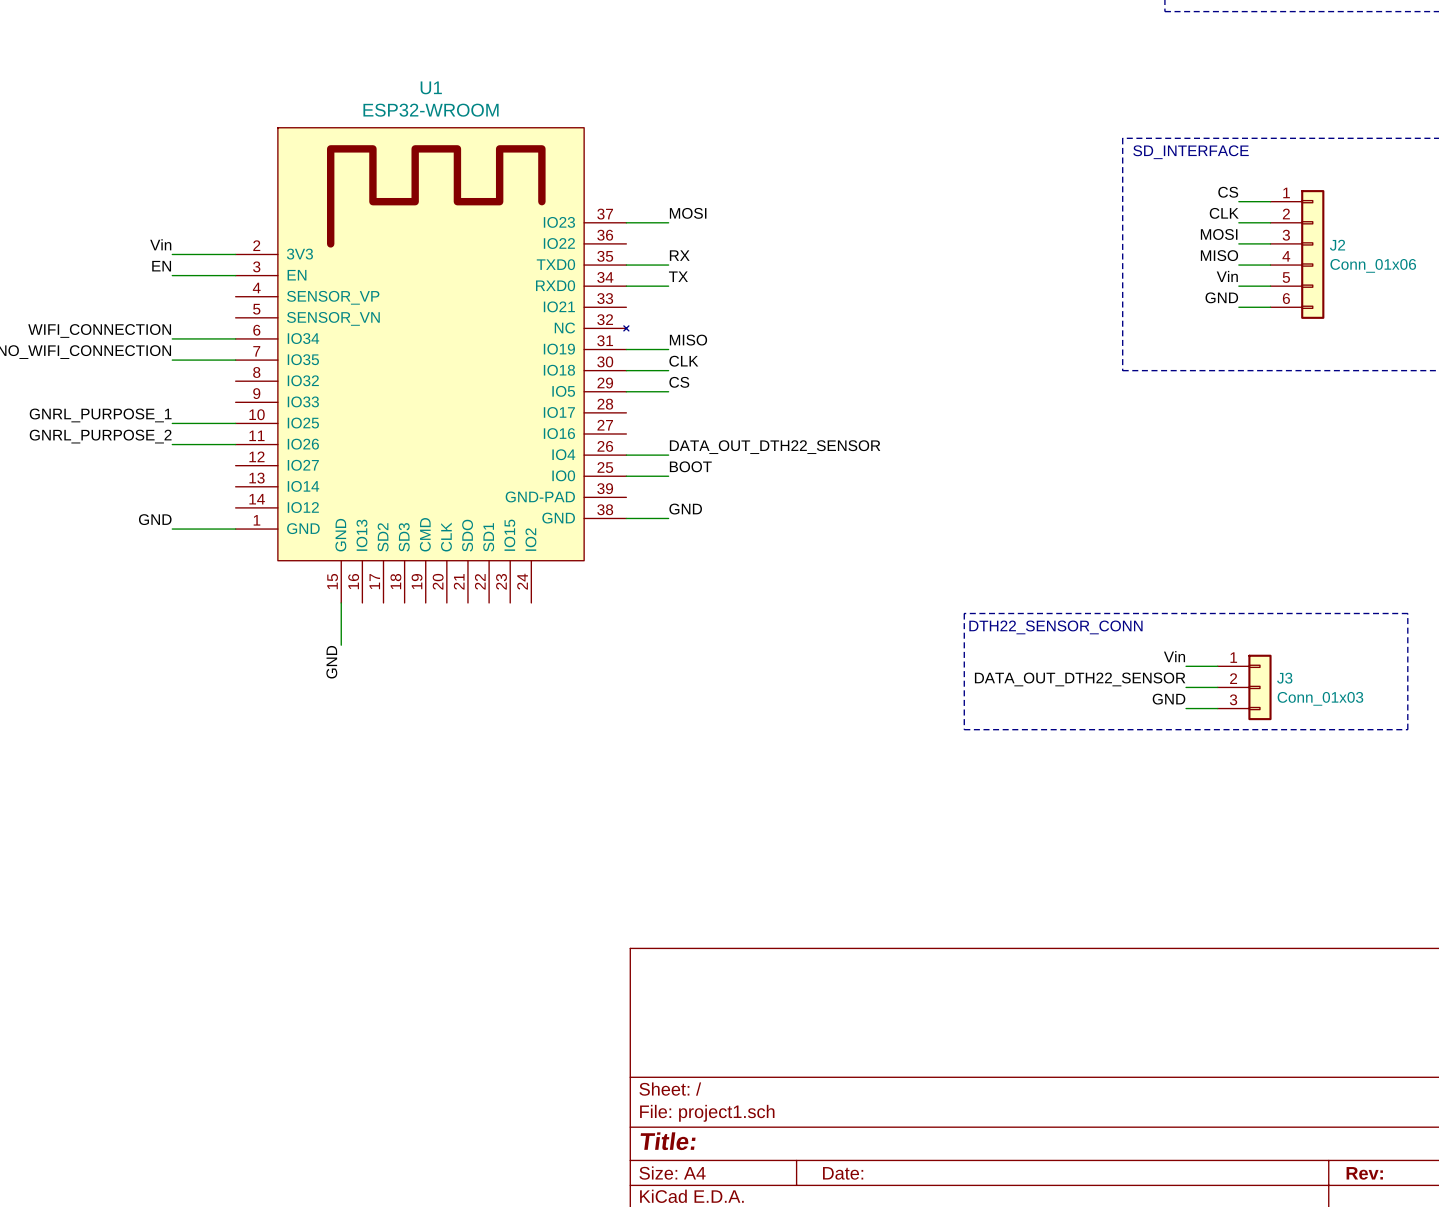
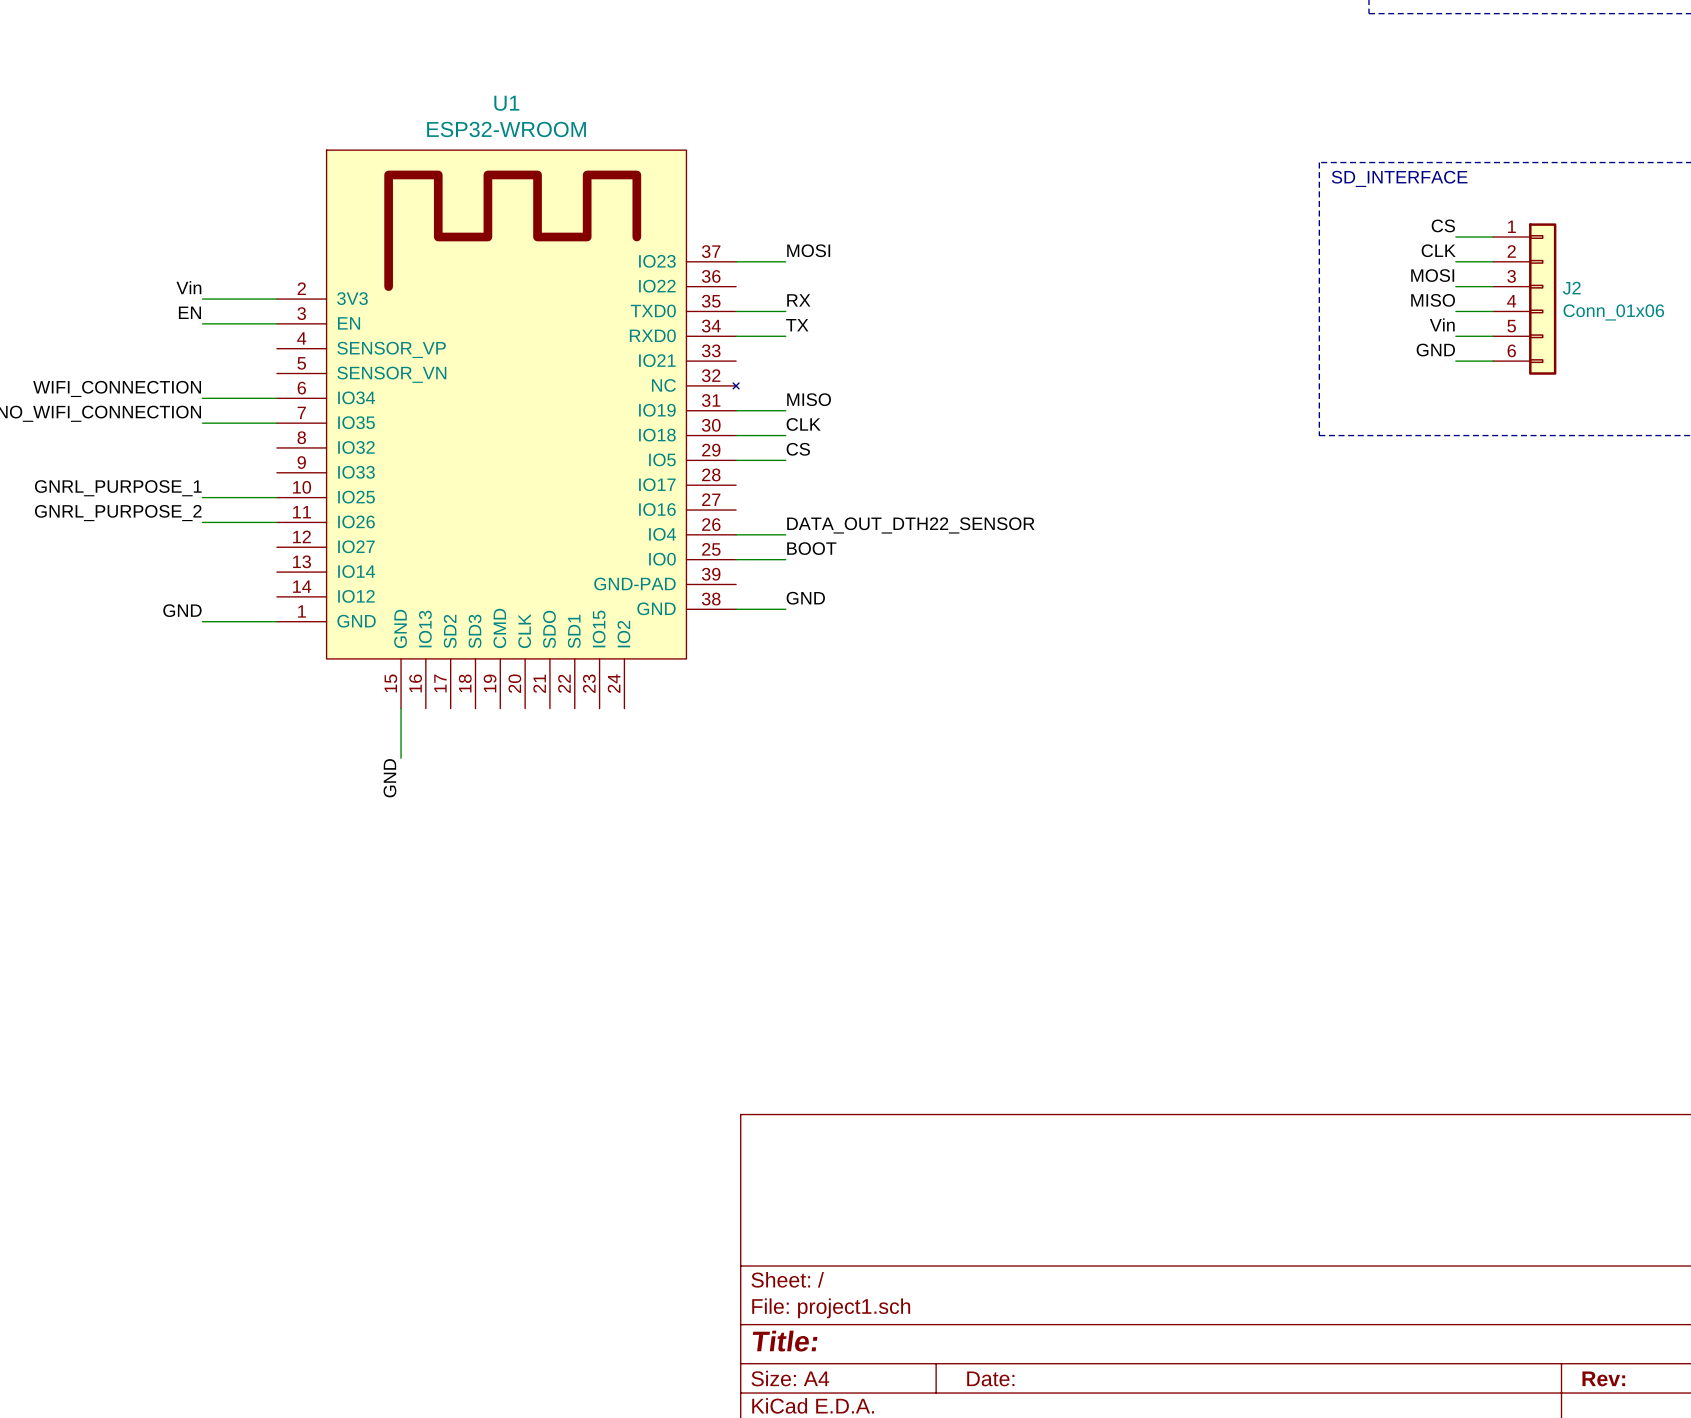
line: (964, 613) (964, 729) (1407, 729) (1407, 613) (964, 613) -> none
text: DTH22_SENSOR_CONN (1055, 627) -> none
label: Vin (1174, 656) -> none
wire: (1186, 666) (1217, 666) -> none
label: DATA_OUT_DTH22_SENSOR (1080, 679) -> none
wire: (1186, 687) (1217, 687) -> none
J3: Conn_01x03 (1244, 687) -> none
label: GND (1169, 699) -> none
wire: (1186, 708) (1217, 708) -> none

